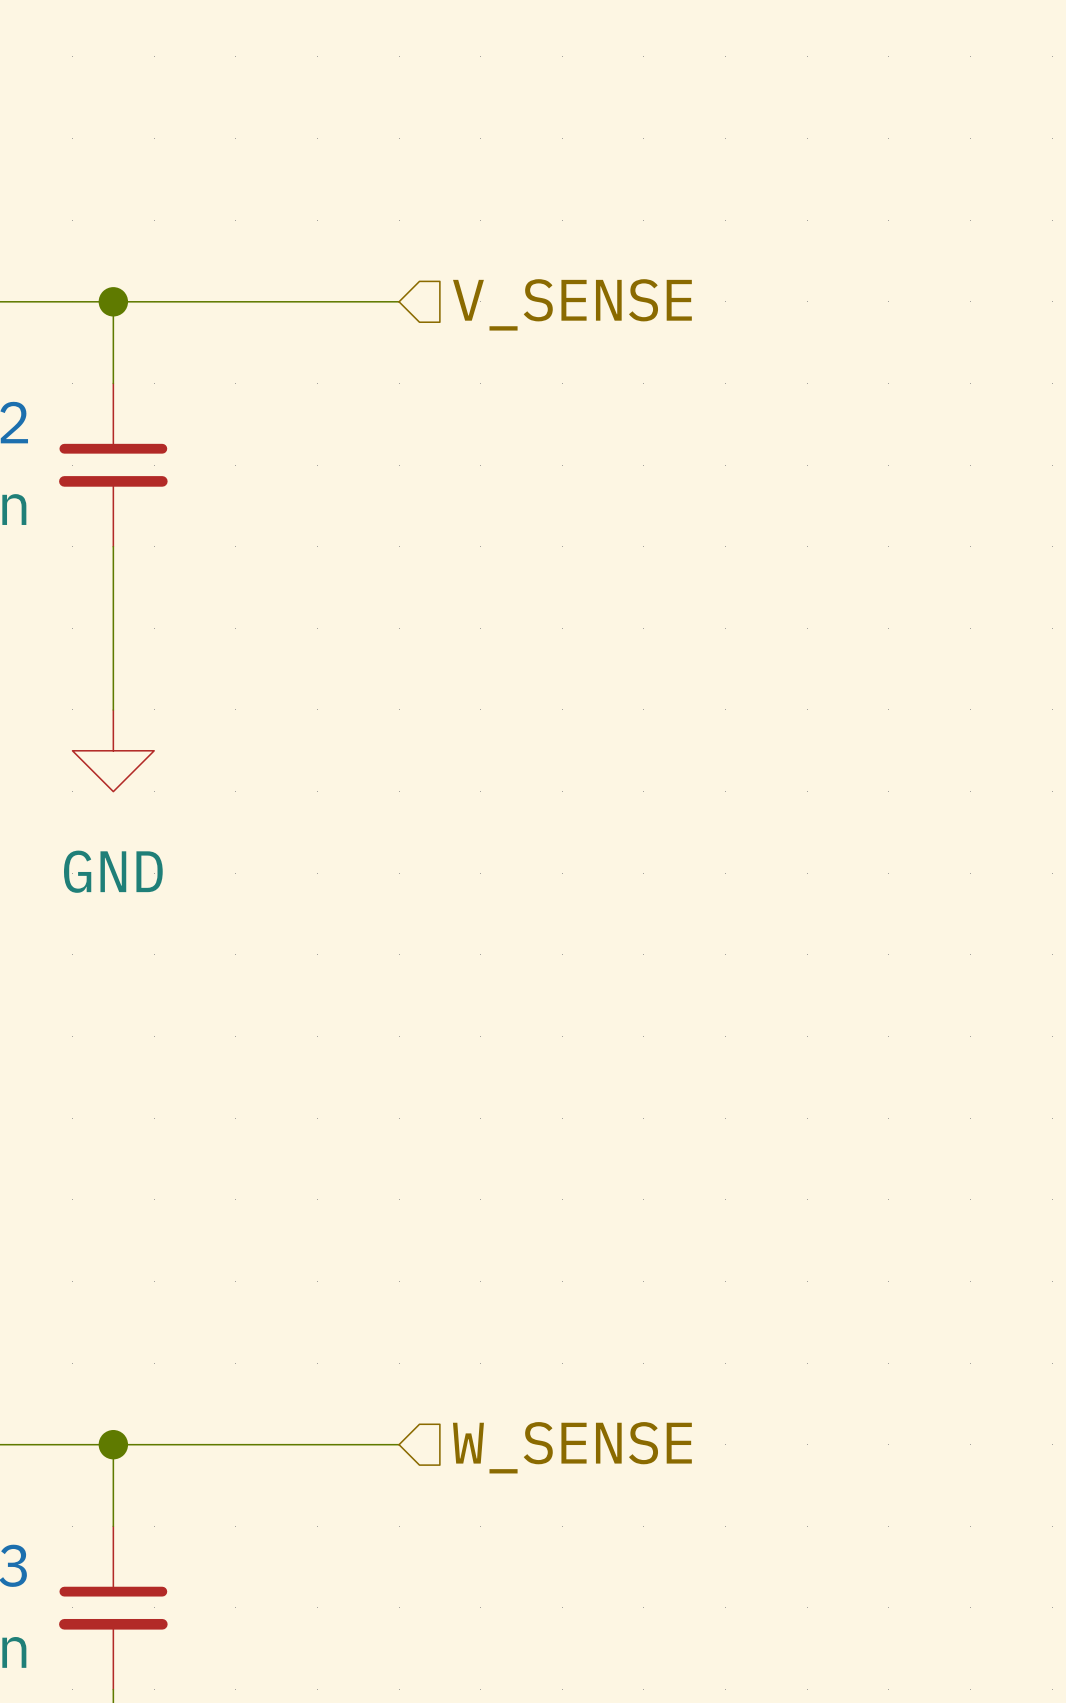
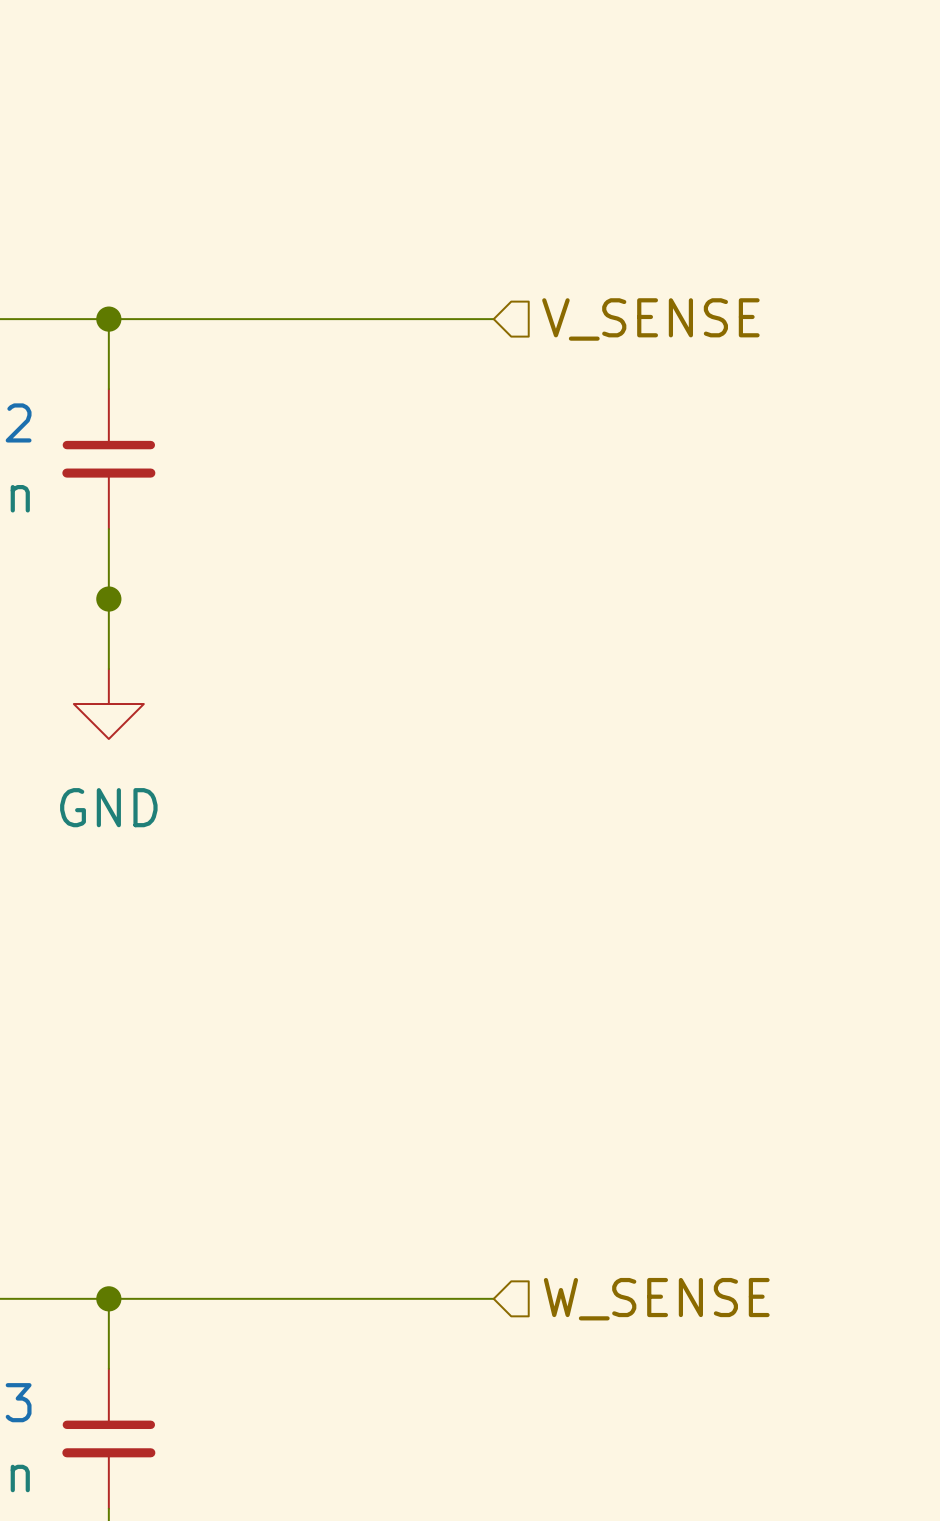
wire: none -> (353, 319) (493, 319)
hierarchical label position: V_SENSE (572, 304) -> V_SENSE (650, 319)
junction: none -> (108, 599)
wire: none -> (353, 1298) (493, 1298)
hierarchical label position: W_SENSE (572, 1447) -> W_SENSE (656, 1299)

